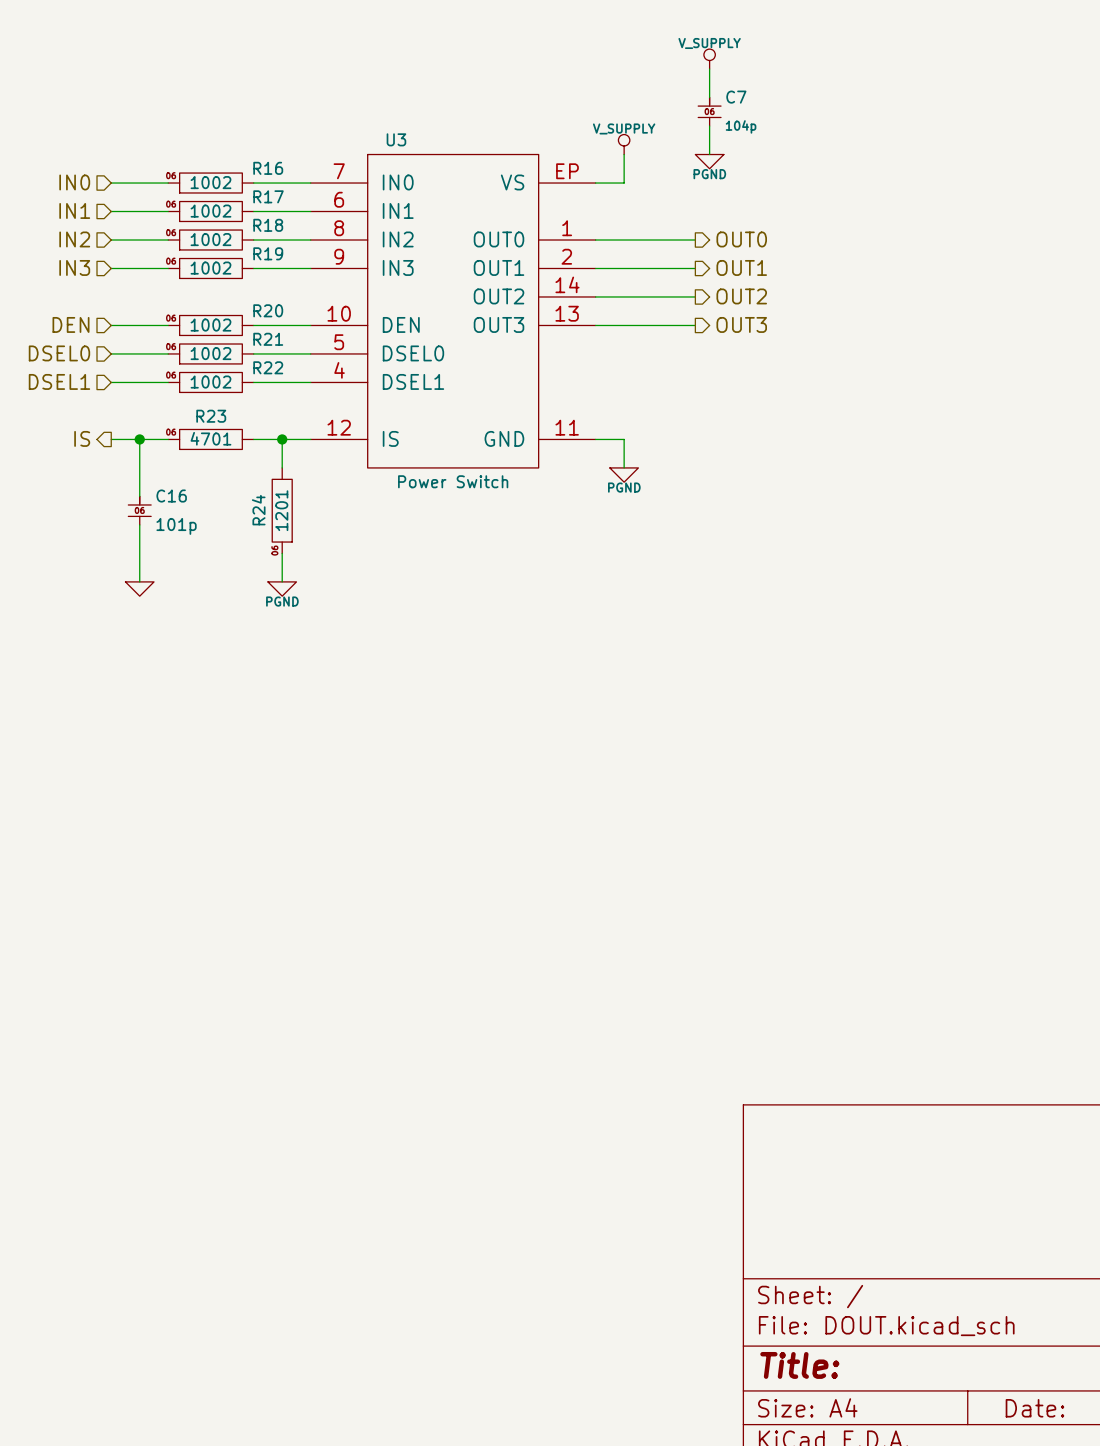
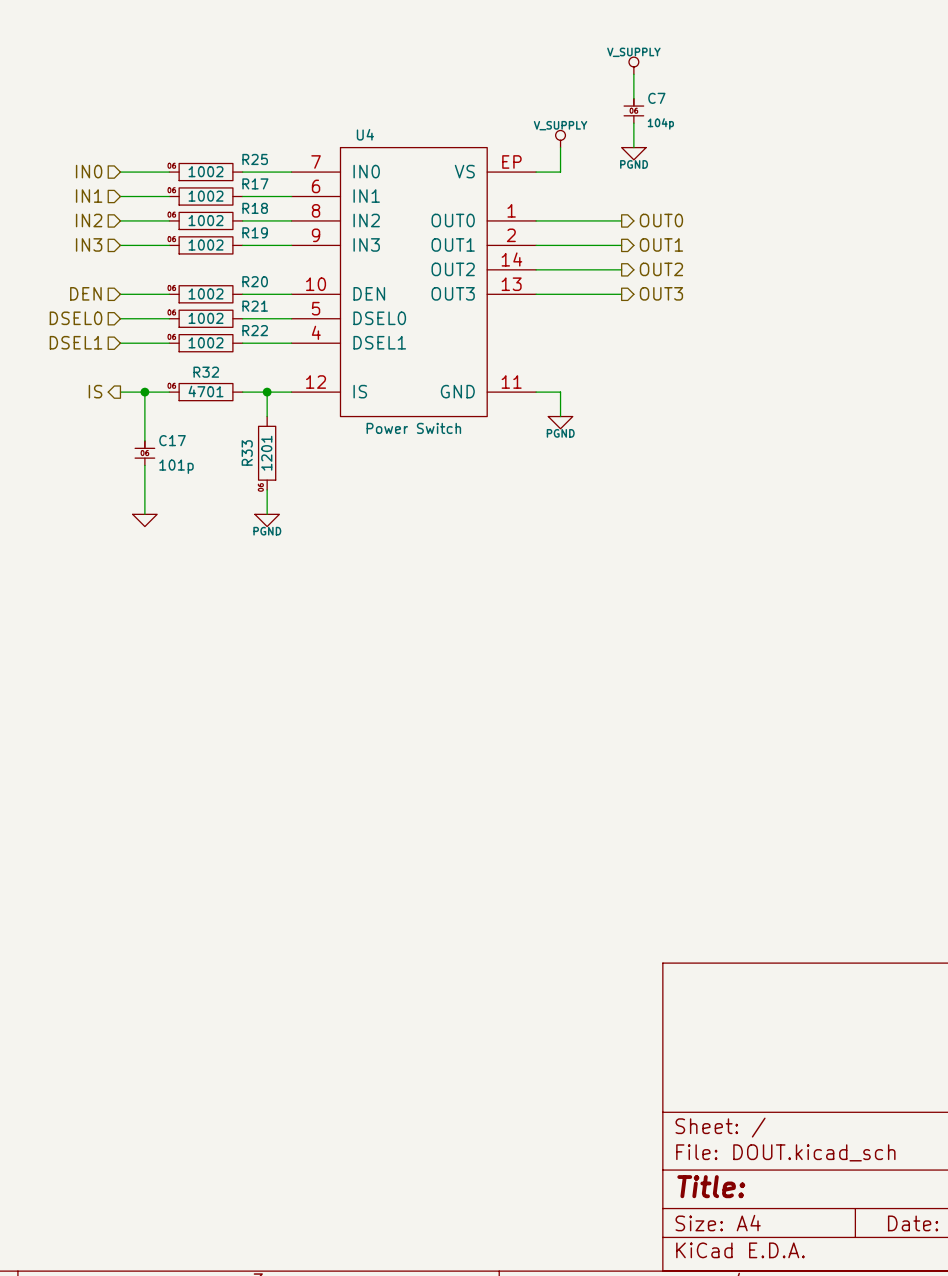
U3 name: U3 (396, 139) -> U4 (365, 134)
R16 name: R16 (268, 168) -> R25 (255, 159)
R23 name: R23 (211, 416) -> R32 (206, 372)
C16 name: C16 (171, 496) -> C17 (172, 440)
R24 name: R24 (258, 510) -> R33 (247, 452)

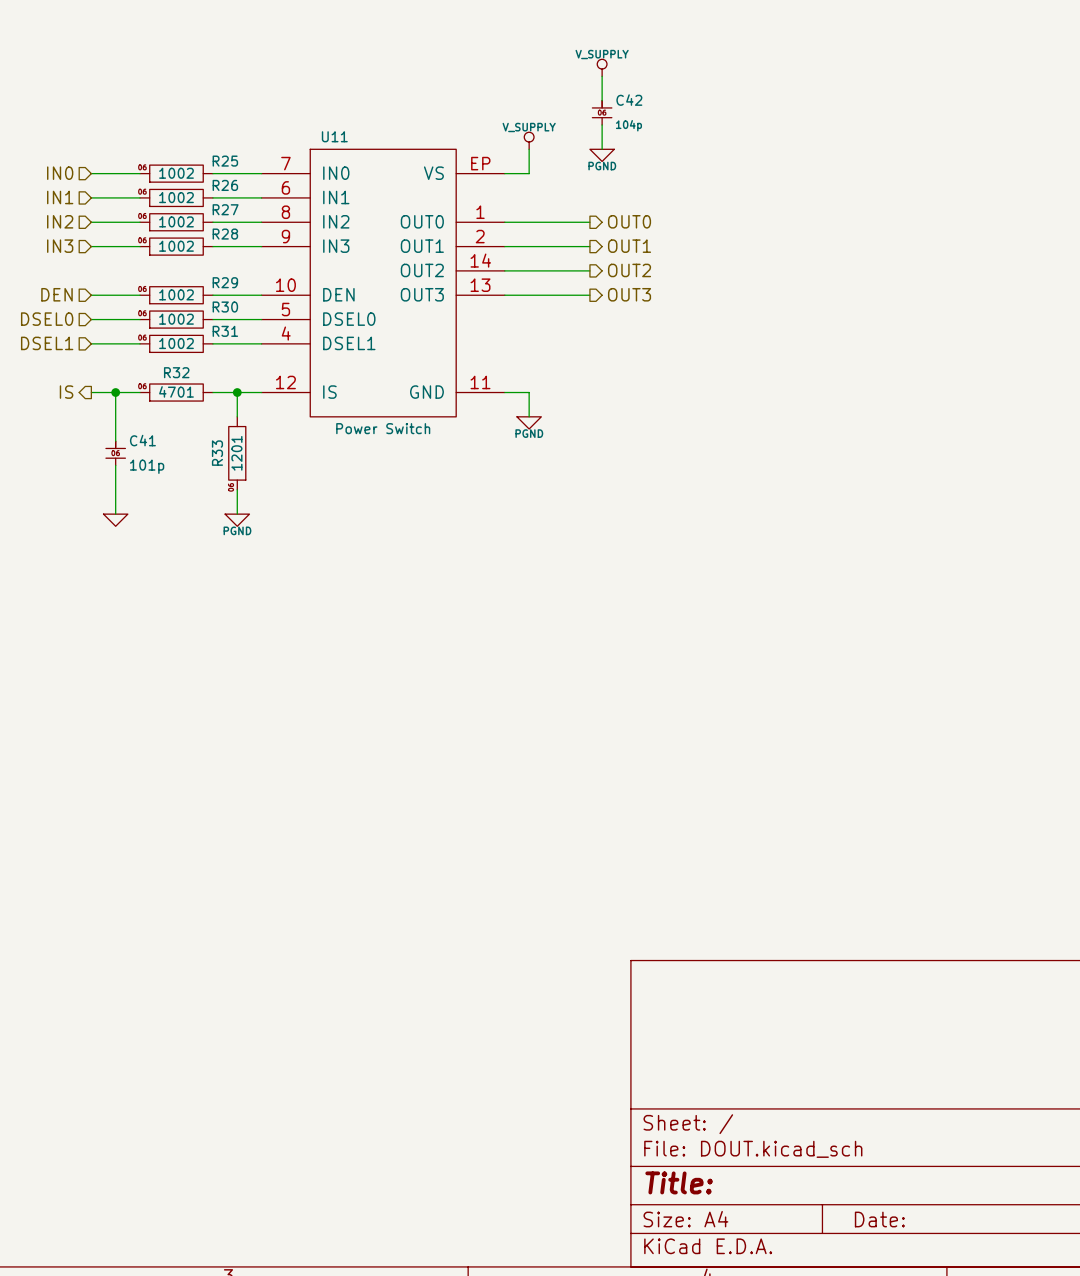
C7 name: C7 (656, 98) -> C42 (629, 100)
U4 name: U4 (365, 134) -> U11 (334, 136)
R17 name: R17 (255, 183) -> R26 (225, 185)
R18 name: R18 (255, 208) -> R27 (225, 209)
R19 name: R19 (255, 232) -> R28 (225, 234)
R20 name: R20 (255, 281) -> R29 (225, 282)
R21 name: R21 (255, 306) -> R30 (225, 307)
R22 name: R22 (255, 330) -> R31 (225, 331)
C17 name: C17 (172, 440) -> C41 (142, 440)

